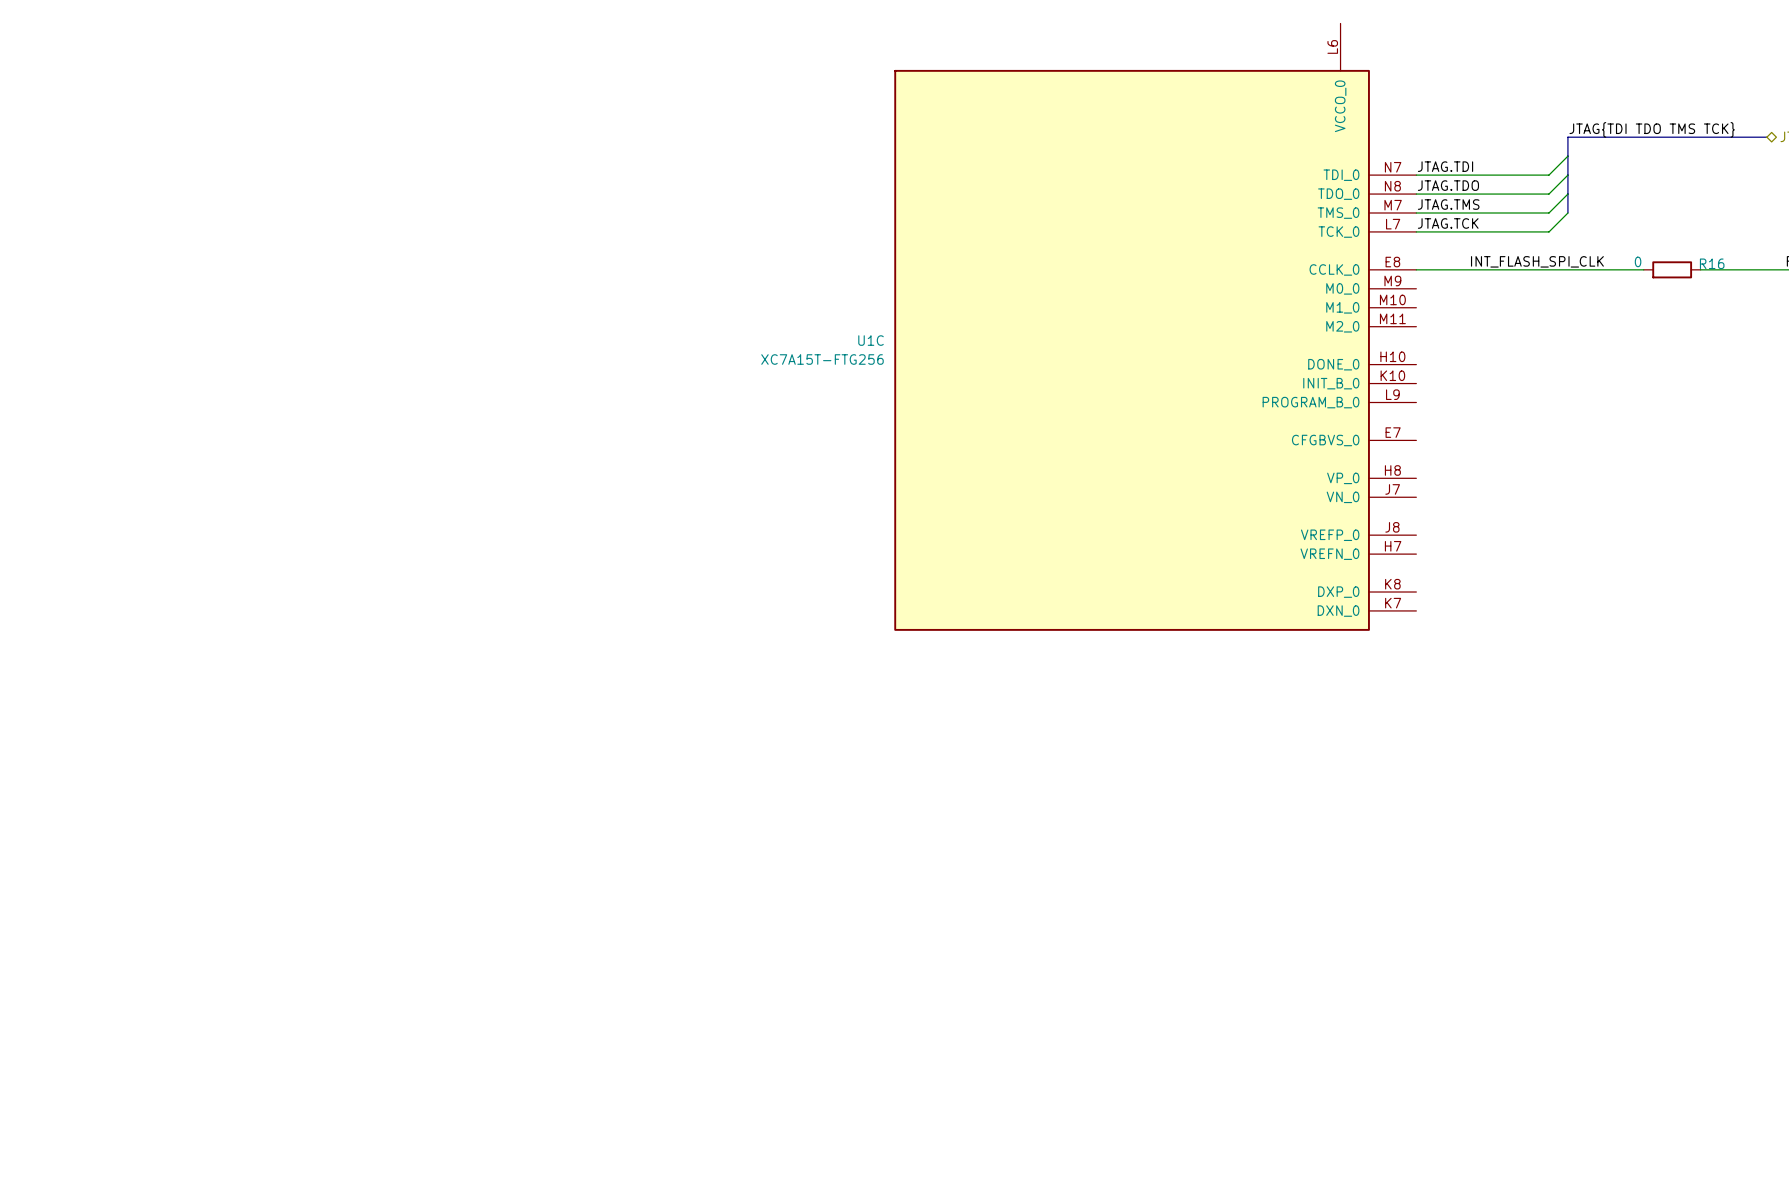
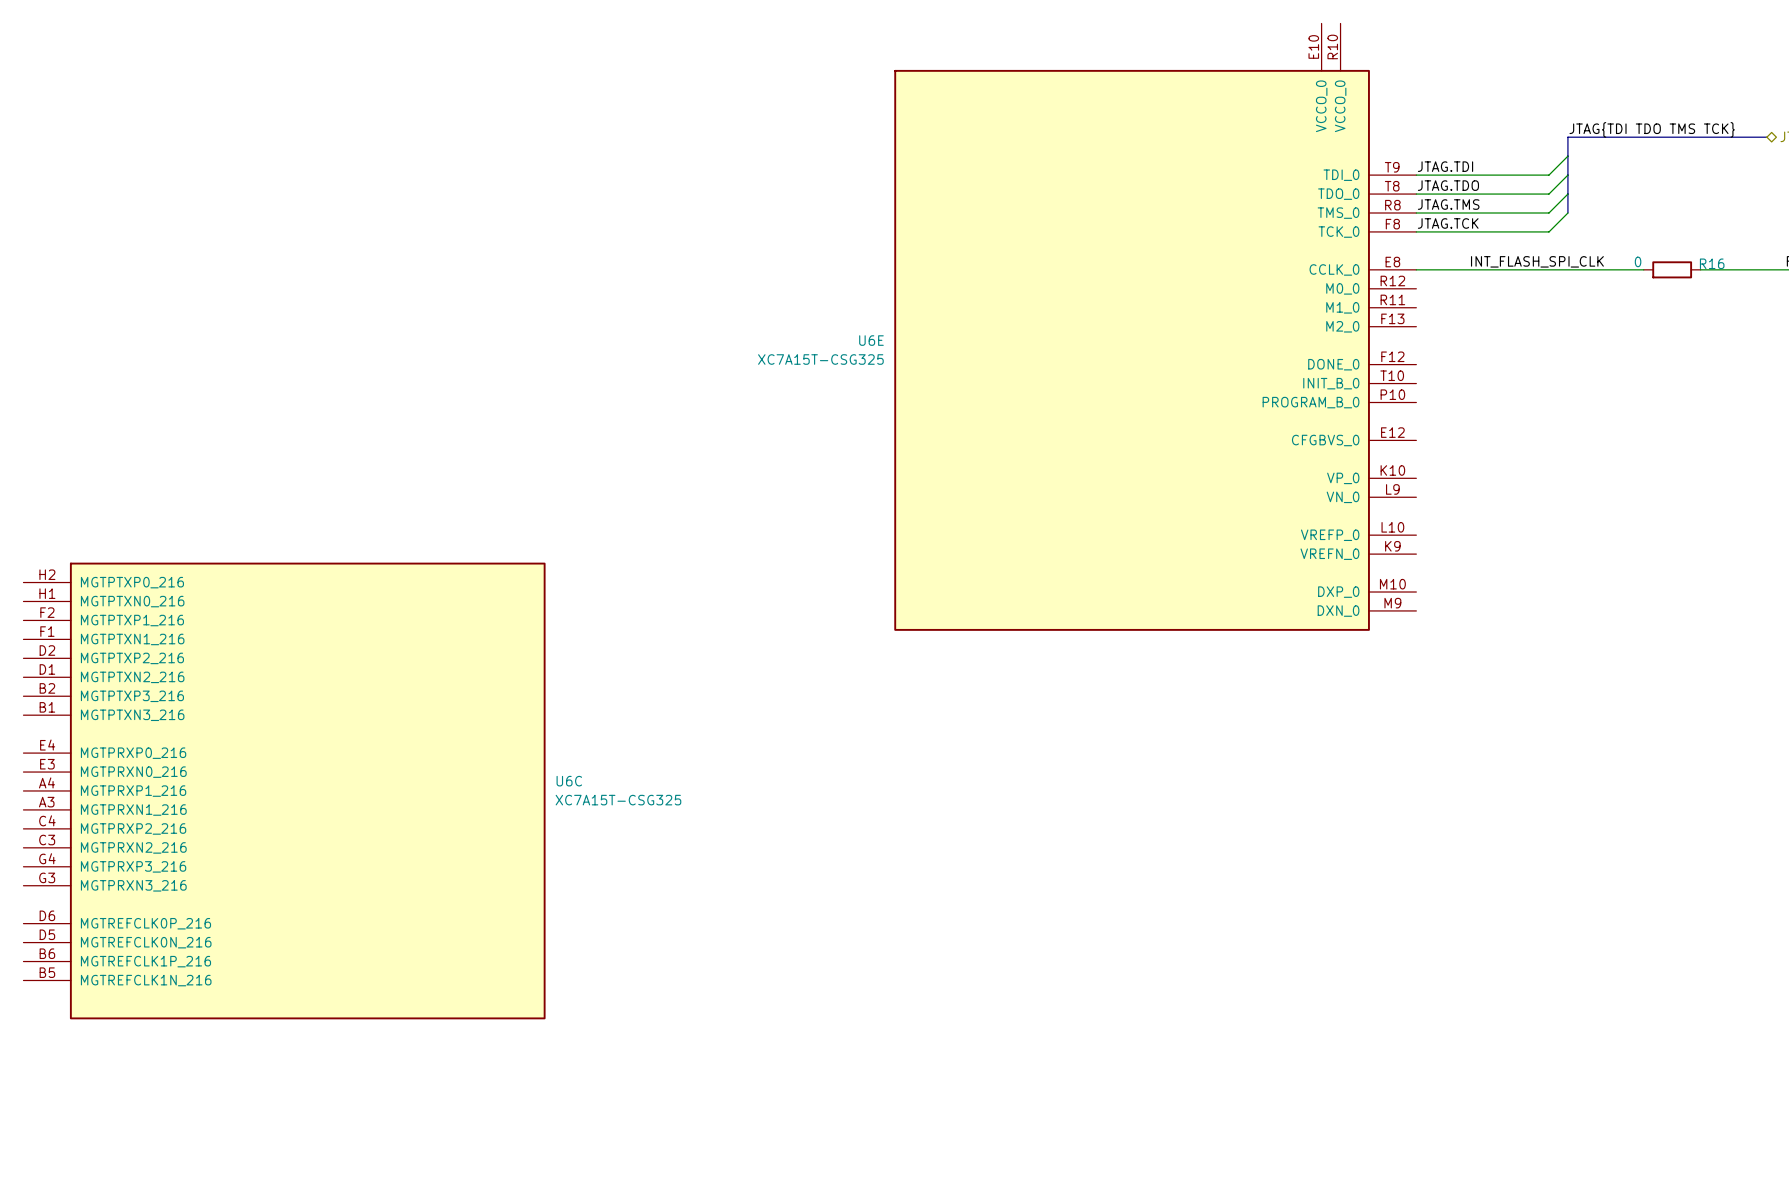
U1C: XC7A15T-FTG256 (1155, 327) -> none
U6E: none -> XC7A15T-CSG325 (1155, 327)
U6C: none -> XC7A15T-CSG325 (284, 790)

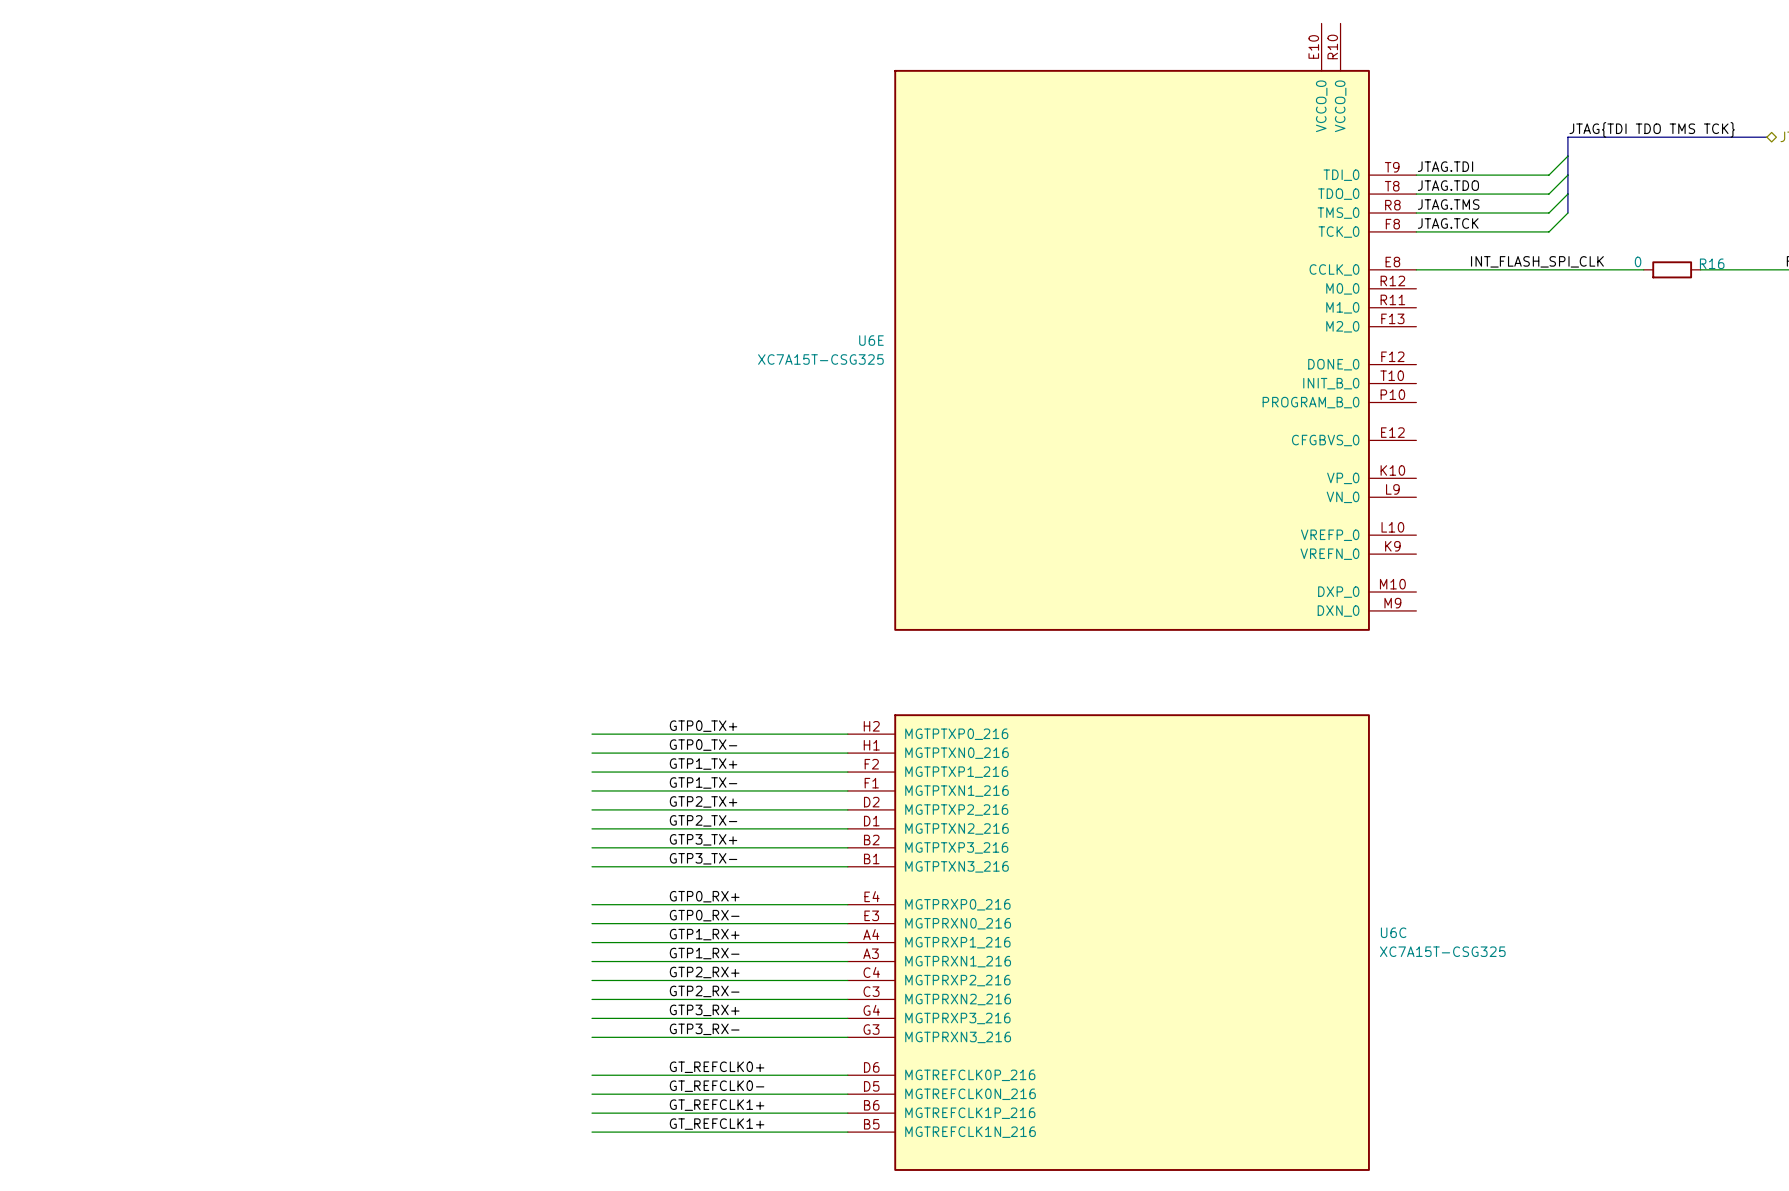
label: none -> GTP0_TX+ (703, 726)
wire: none -> (592, 734) (847, 734)
label: none -> GTP0_TX- (703, 745)
wire: none -> (592, 753) (847, 753)
label: none -> GTP1_TX+ (703, 764)
wire: none -> (592, 772) (847, 772)
label: none -> GTP1_TX- (703, 782)
U6C position: (284, 790) -> (1108, 942)
wire: none -> (592, 790) (847, 790)
label: none -> GTP2_TX+ (703, 801)
wire: none -> (592, 809) (847, 809)
label: none -> GTP2_TX- (703, 820)
wire: none -> (592, 828) (847, 828)
label: none -> GTP3_TX+ (703, 839)
wire: none -> (592, 847) (847, 847)
label: none -> GTP3_TX- (703, 858)
wire: none -> (592, 866) (847, 866)
label: none -> GTP0_RX+ (704, 896)
wire: none -> (592, 904) (847, 904)
label: none -> GTP0_RX- (704, 915)
wire: none -> (592, 923) (847, 923)
label: none -> GTP1_RX+ (704, 934)
wire: none -> (592, 942) (847, 942)
label: none -> GTP1_RX- (704, 953)
wire: none -> (592, 961) (847, 961)
label: none -> GTP2_RX+ (704, 972)
wire: none -> (592, 980) (847, 980)
label: none -> GTP2_RX- (704, 991)
wire: none -> (592, 999) (847, 999)
label: none -> GTP3_RX+ (704, 1010)
wire: none -> (592, 1018) (847, 1018)
label: none -> GTP3_RX- (704, 1029)
wire: none -> (592, 1037) (847, 1037)
label: none -> GT_REFCLK0+ (717, 1067)
wire: none -> (592, 1075) (847, 1075)
label: none -> GT_REFCLK0- (717, 1086)
wire: none -> (592, 1094) (847, 1094)
label: none -> GT_REFCLK1+ (717, 1105)
wire: none -> (592, 1113) (847, 1113)
label: none -> GT_REFCLK1+ (717, 1124)
wire: none -> (592, 1132) (847, 1132)

